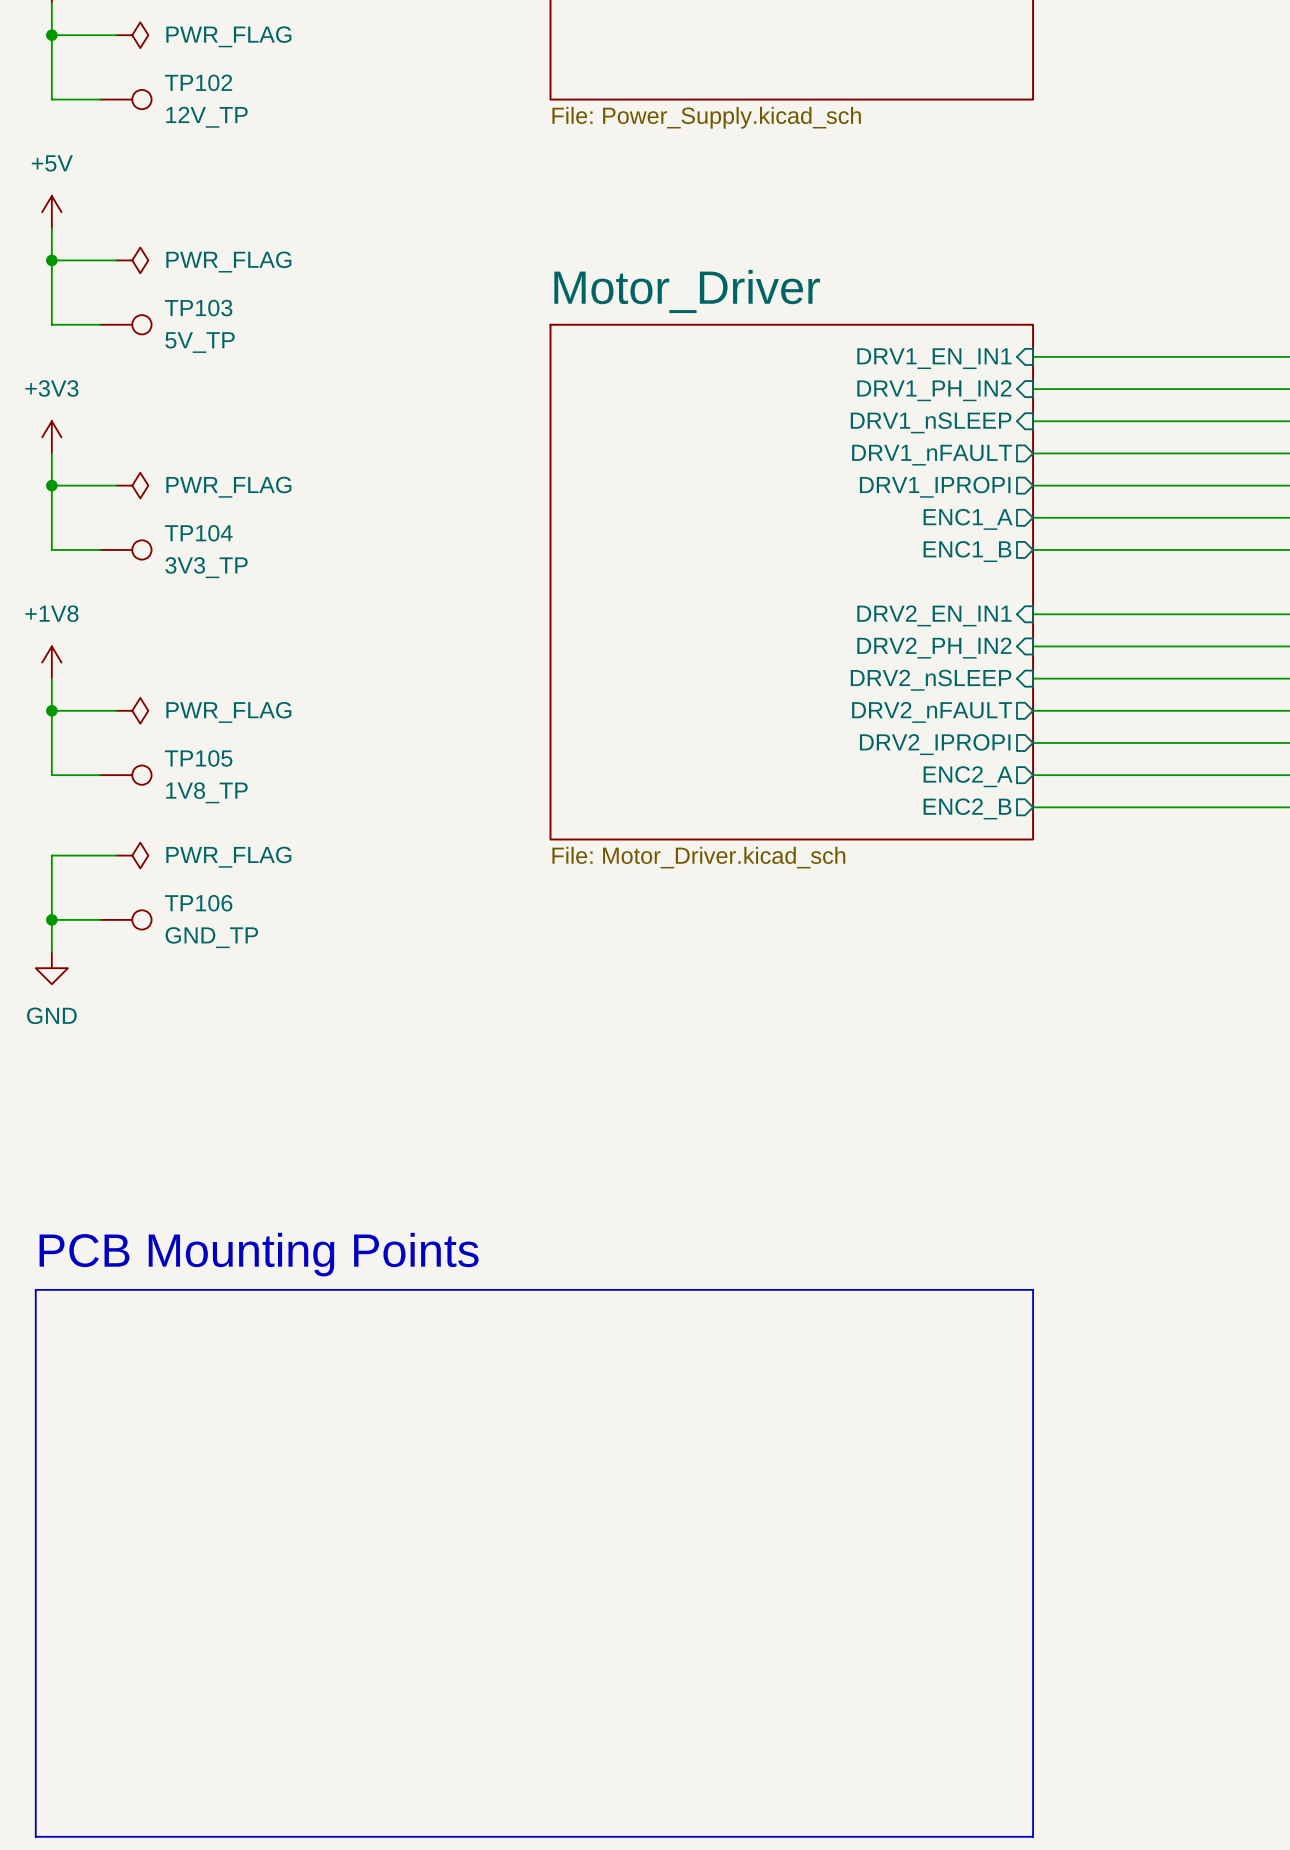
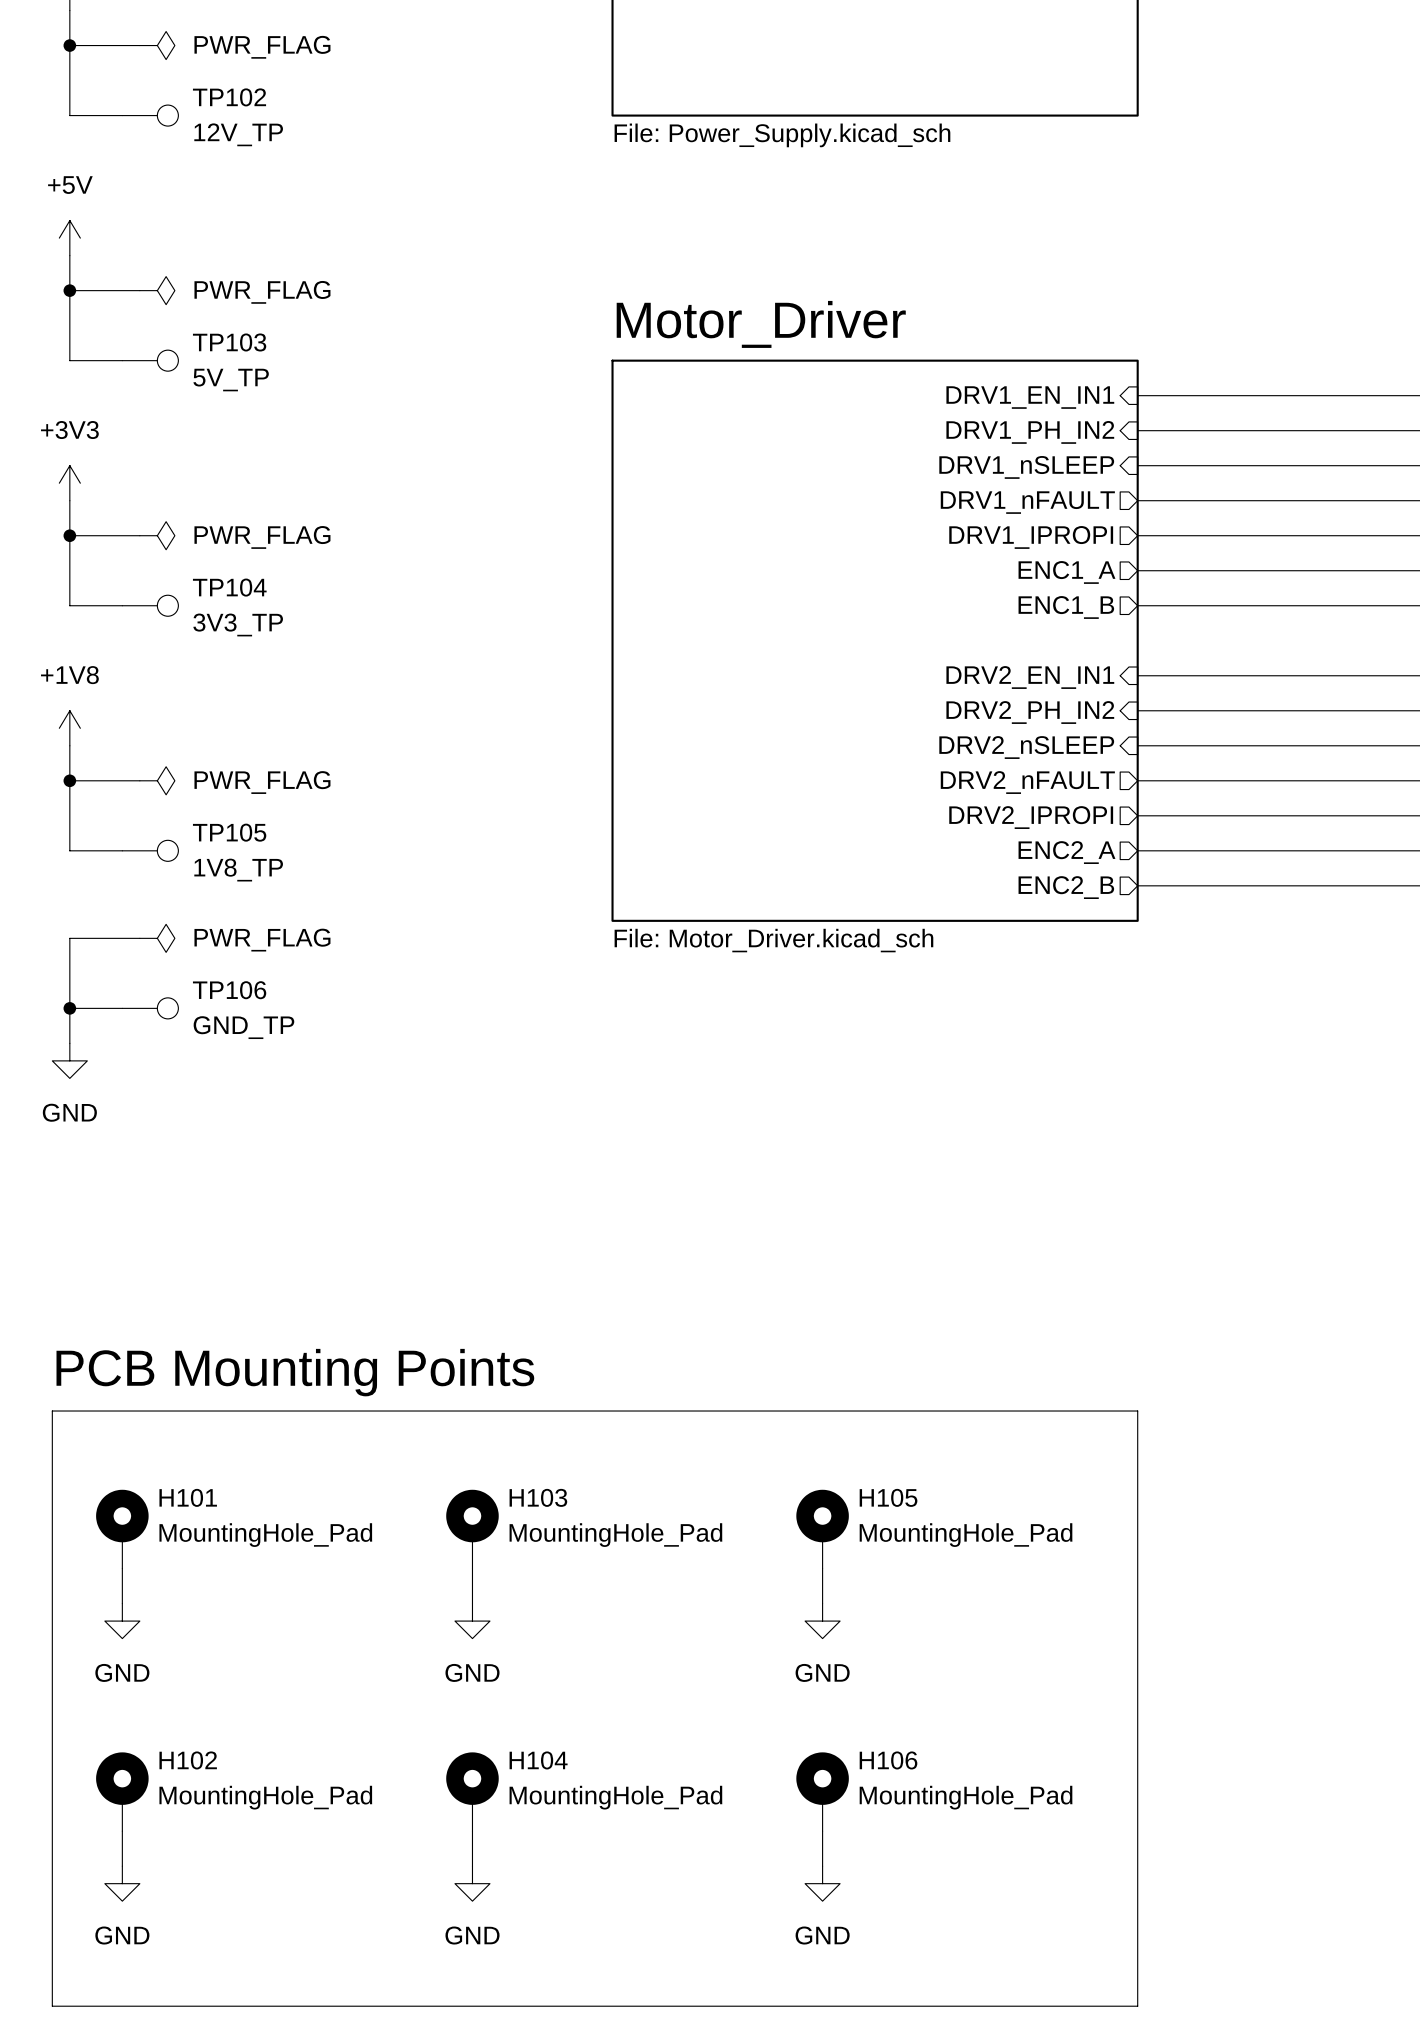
H101: none -> MountingHole_Pad (122, 1529)
H103: none -> MountingHole_Pad (472, 1529)
H105: none -> MountingHole_Pad (822, 1529)
wire: none -> (122, 1568) (122, 1603)
wire: none -> (472, 1568) (472, 1603)
wire: none -> (822, 1568) (822, 1603)
power symbol: none -> GND (122, 1621)
power symbol: none -> GND (472, 1621)
power symbol: none -> GND (822, 1621)
H102: none -> MountingHole_Pad (122, 1791)
H104: none -> MountingHole_Pad (472, 1791)
H106: none -> MountingHole_Pad (822, 1791)
wire: none -> (122, 1831) (122, 1866)
wire: none -> (472, 1831) (472, 1866)
wire: none -> (822, 1831) (822, 1866)
power symbol: none -> GND (122, 1883)
power symbol: none -> GND (472, 1883)
power symbol: none -> GND (822, 1883)

